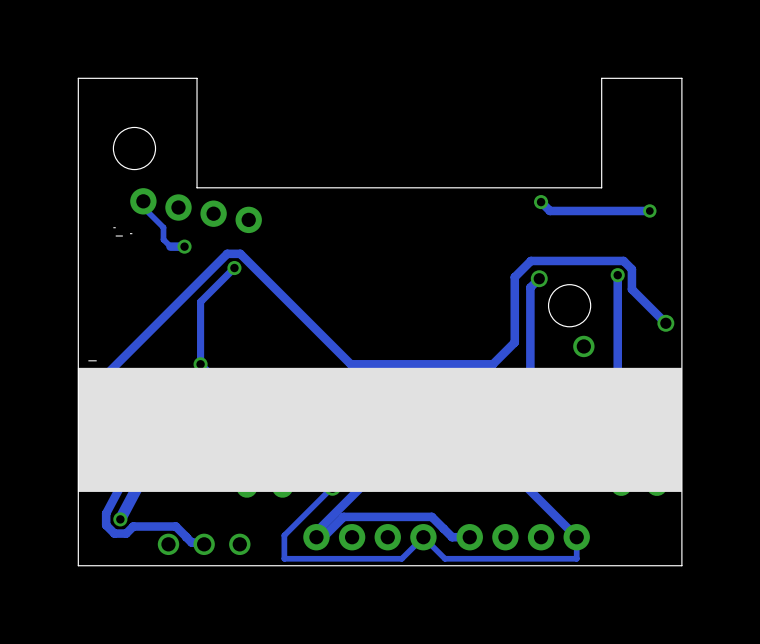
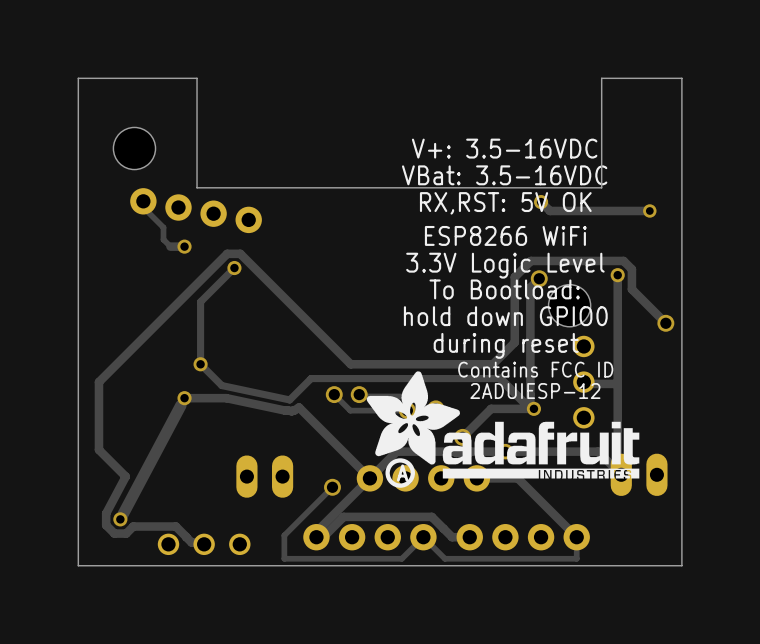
text: none -> V+: 3.5-16VDC (504, 148)
text: none -> VBat: 3.5-16VDC (504, 175)
text: none -> RX,RST: 5V OK (505, 203)
drawing: [77, 227, 682, 492] -> none
text: none -> ESP8266 WiFi (505, 235)
text: none -> 3.3V Logic Level (505, 265)
text: none -> To Bootload: (504, 289)
text: none -> hold down GPIO0 (505, 316)
text: none -> during reset (506, 345)
text: none -> Contains FCC ID (535, 369)
text: none -> 2ADUIESP-12 (535, 391)
drawing: none -> [385, 458, 415, 488]

